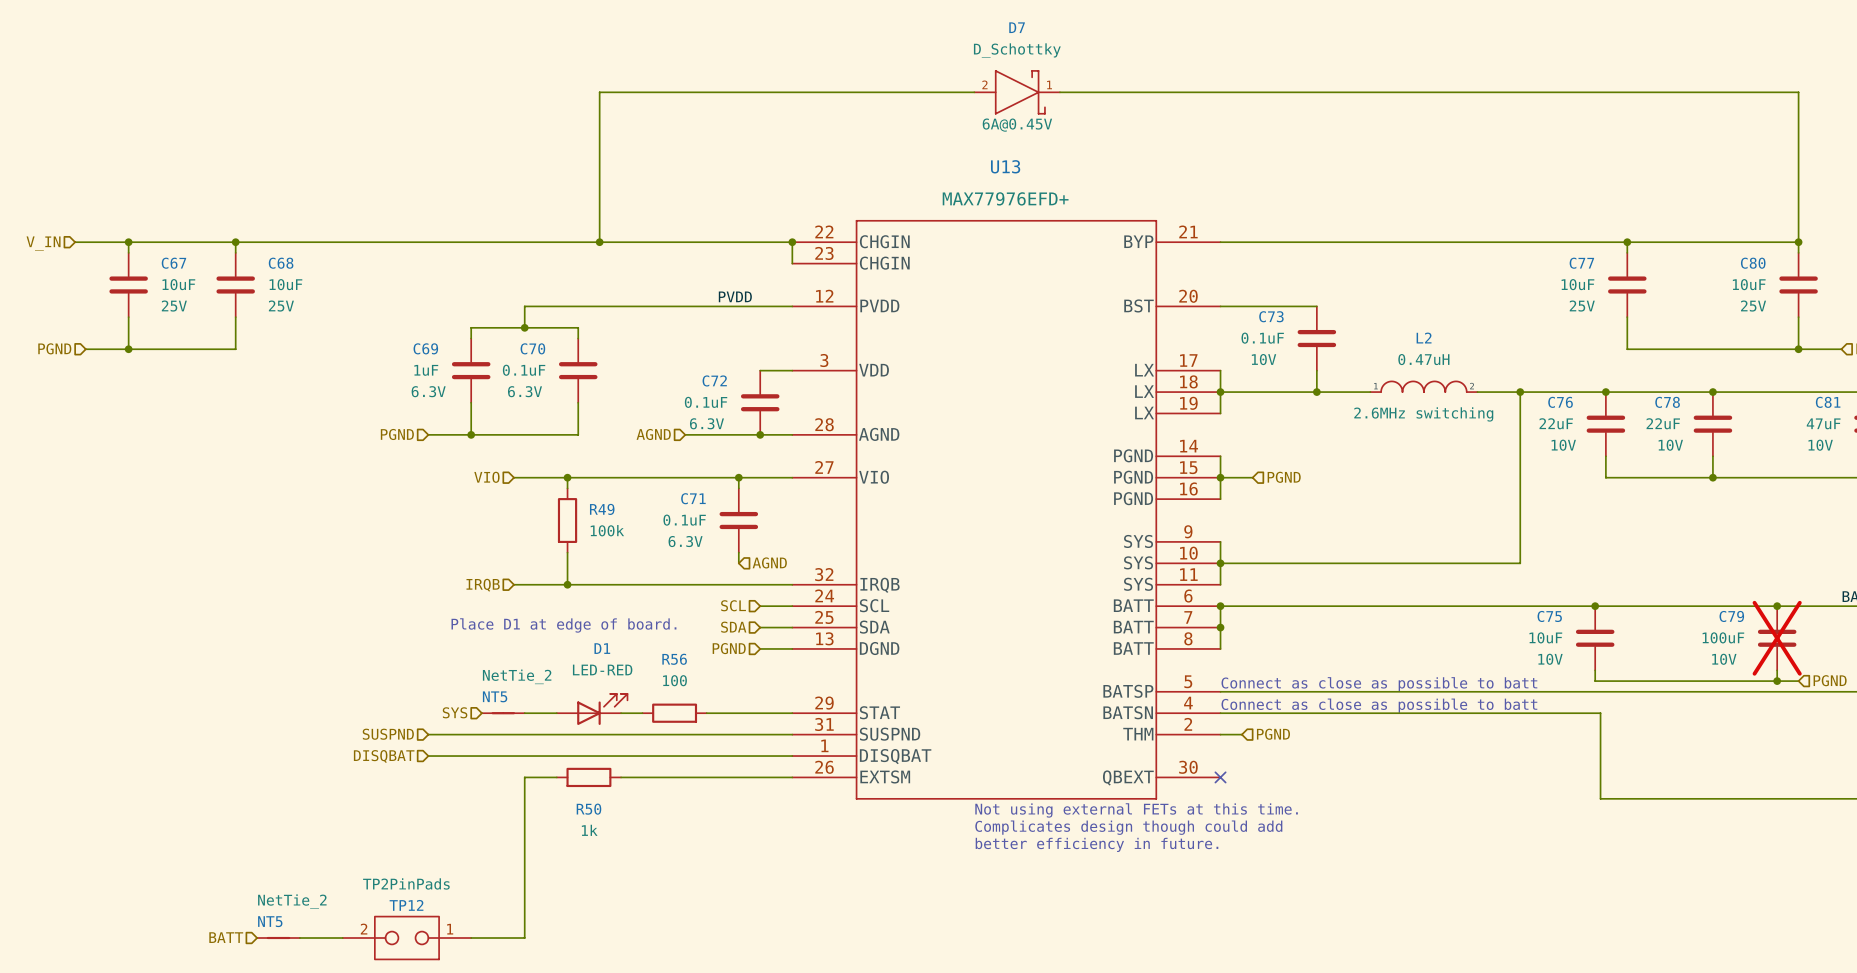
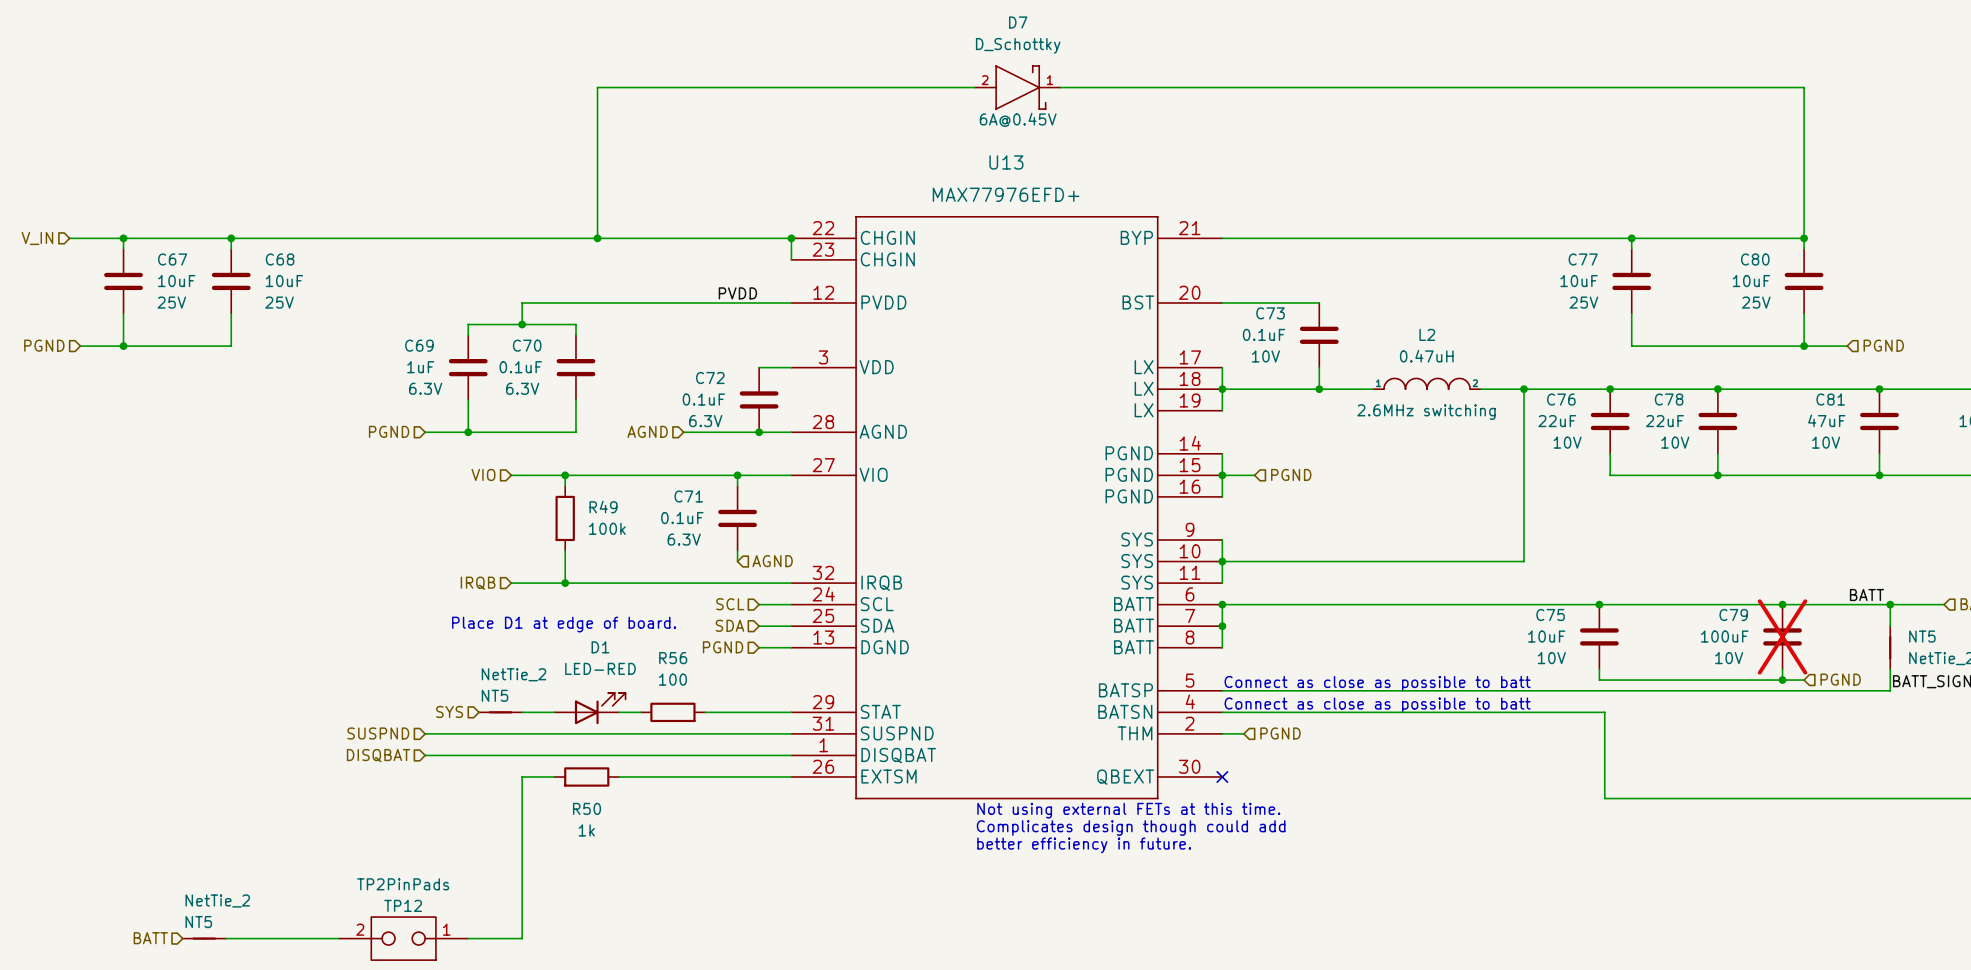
hierarchical label position: BATT (226, 937) -> BATT (150, 938)
NT5 position: (278, 938) -> (204, 938)

